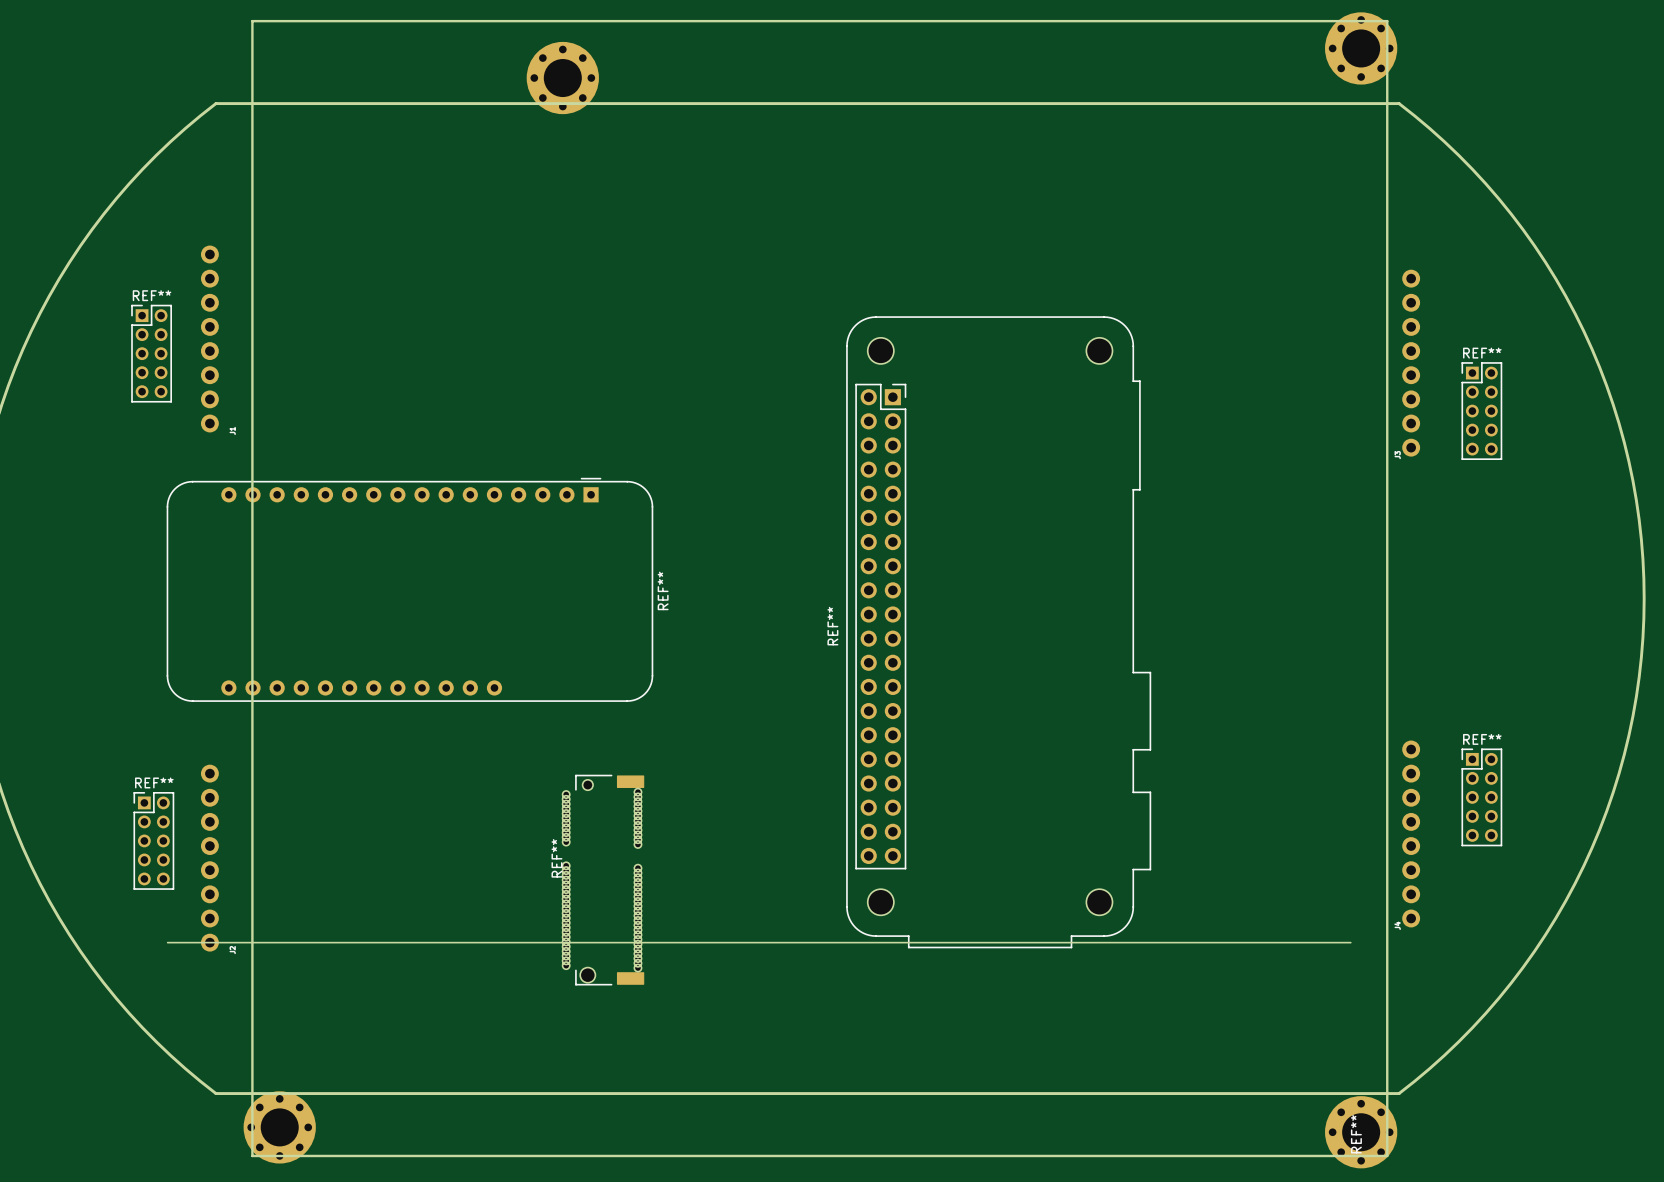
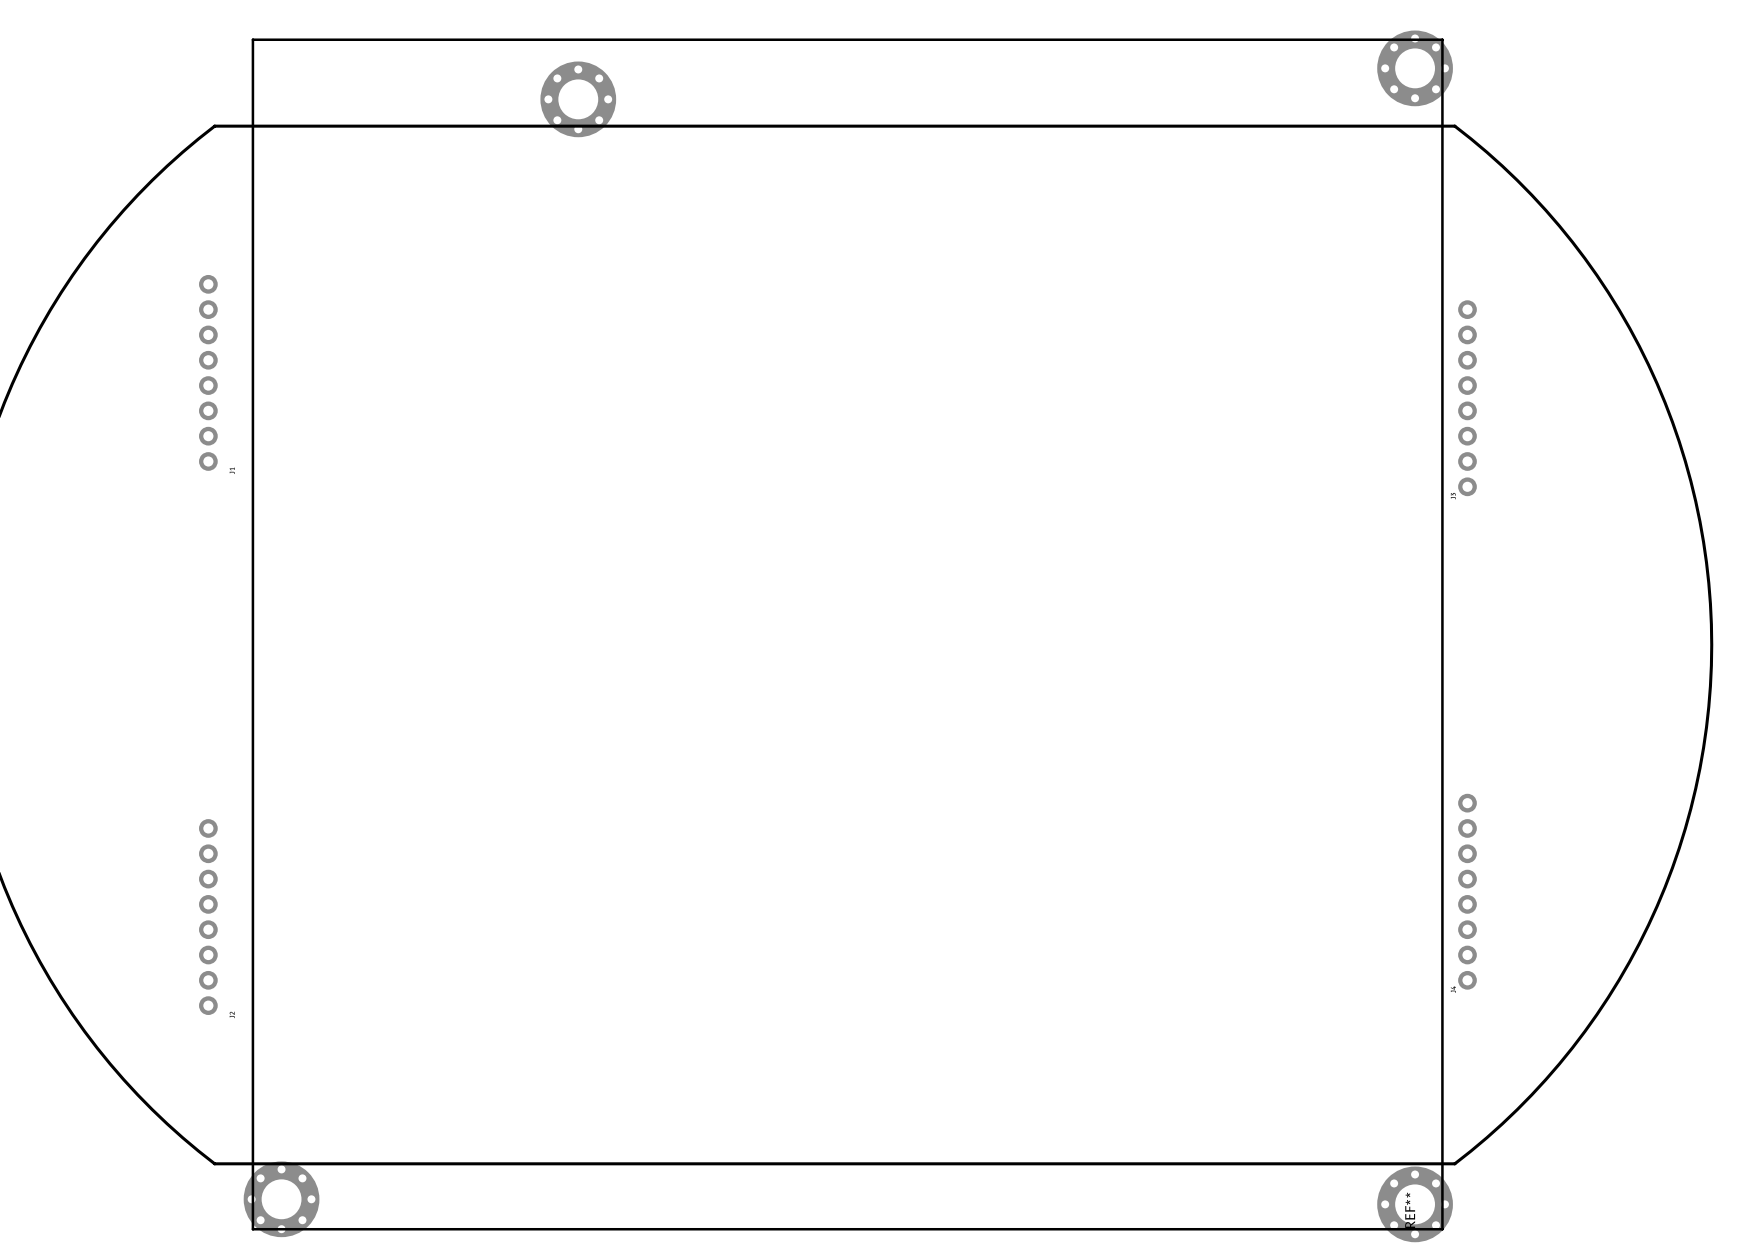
REF**: (151, 353) -> none
REF**: (1481, 411) -> none
REF**: (409, 589) -> none
REF**: (998, 632) -> none
REF**: (1481, 797) -> none
REF**: (153, 840) -> none
REF**: (603, 880) -> none
board edge: (167, 942) (1350, 942) -> none

